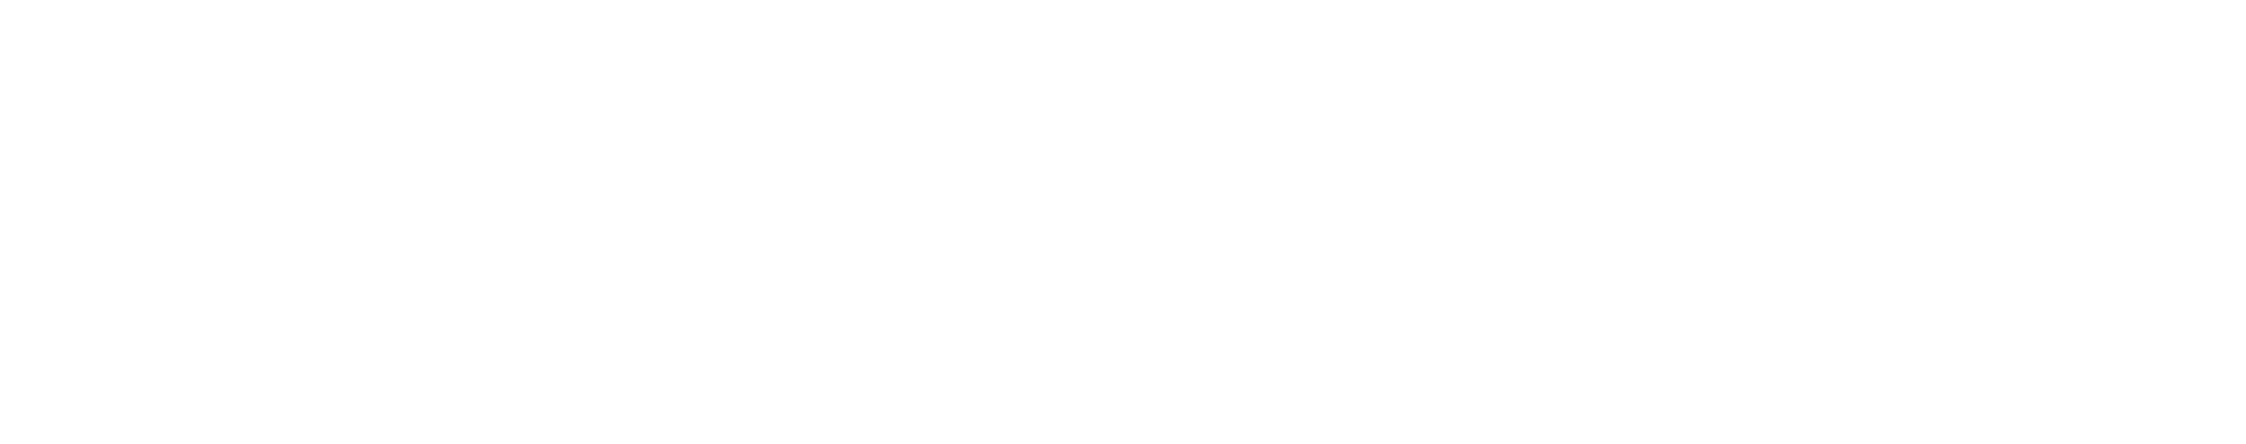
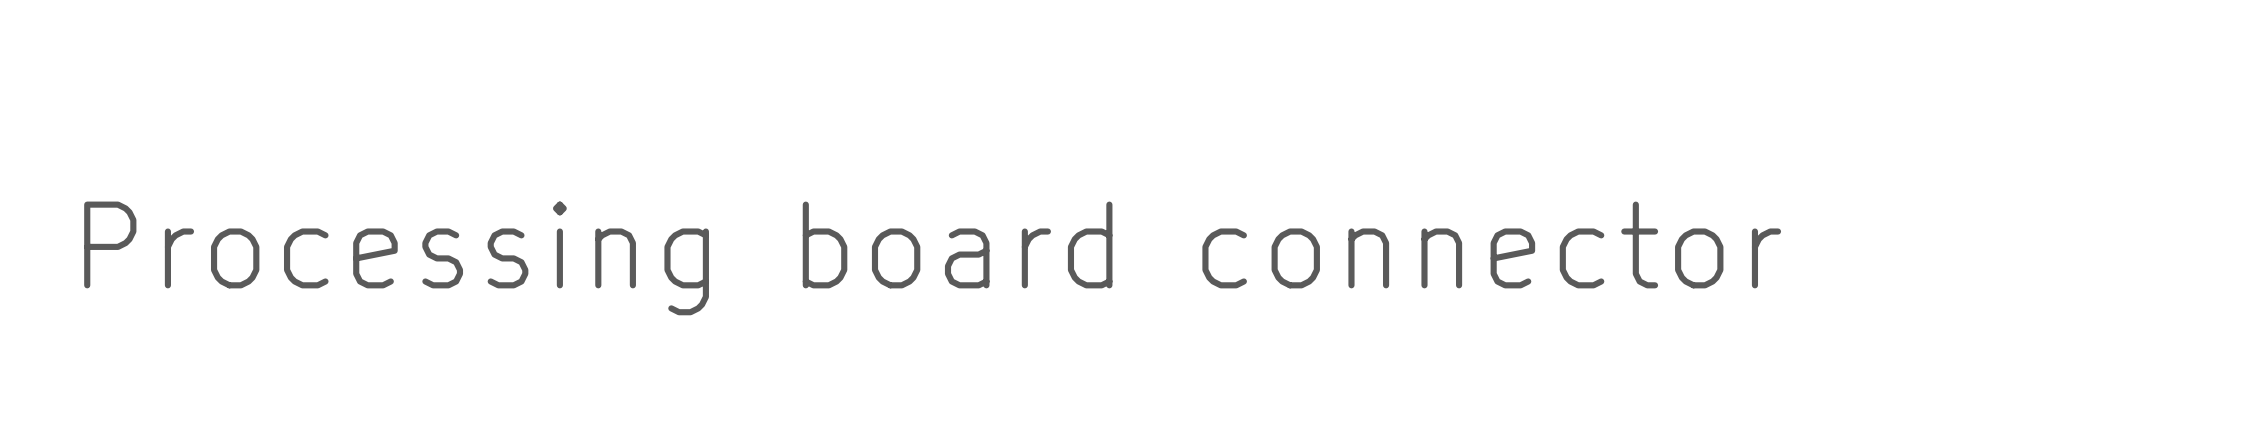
text: none -> Processing board connector (932, 258)

